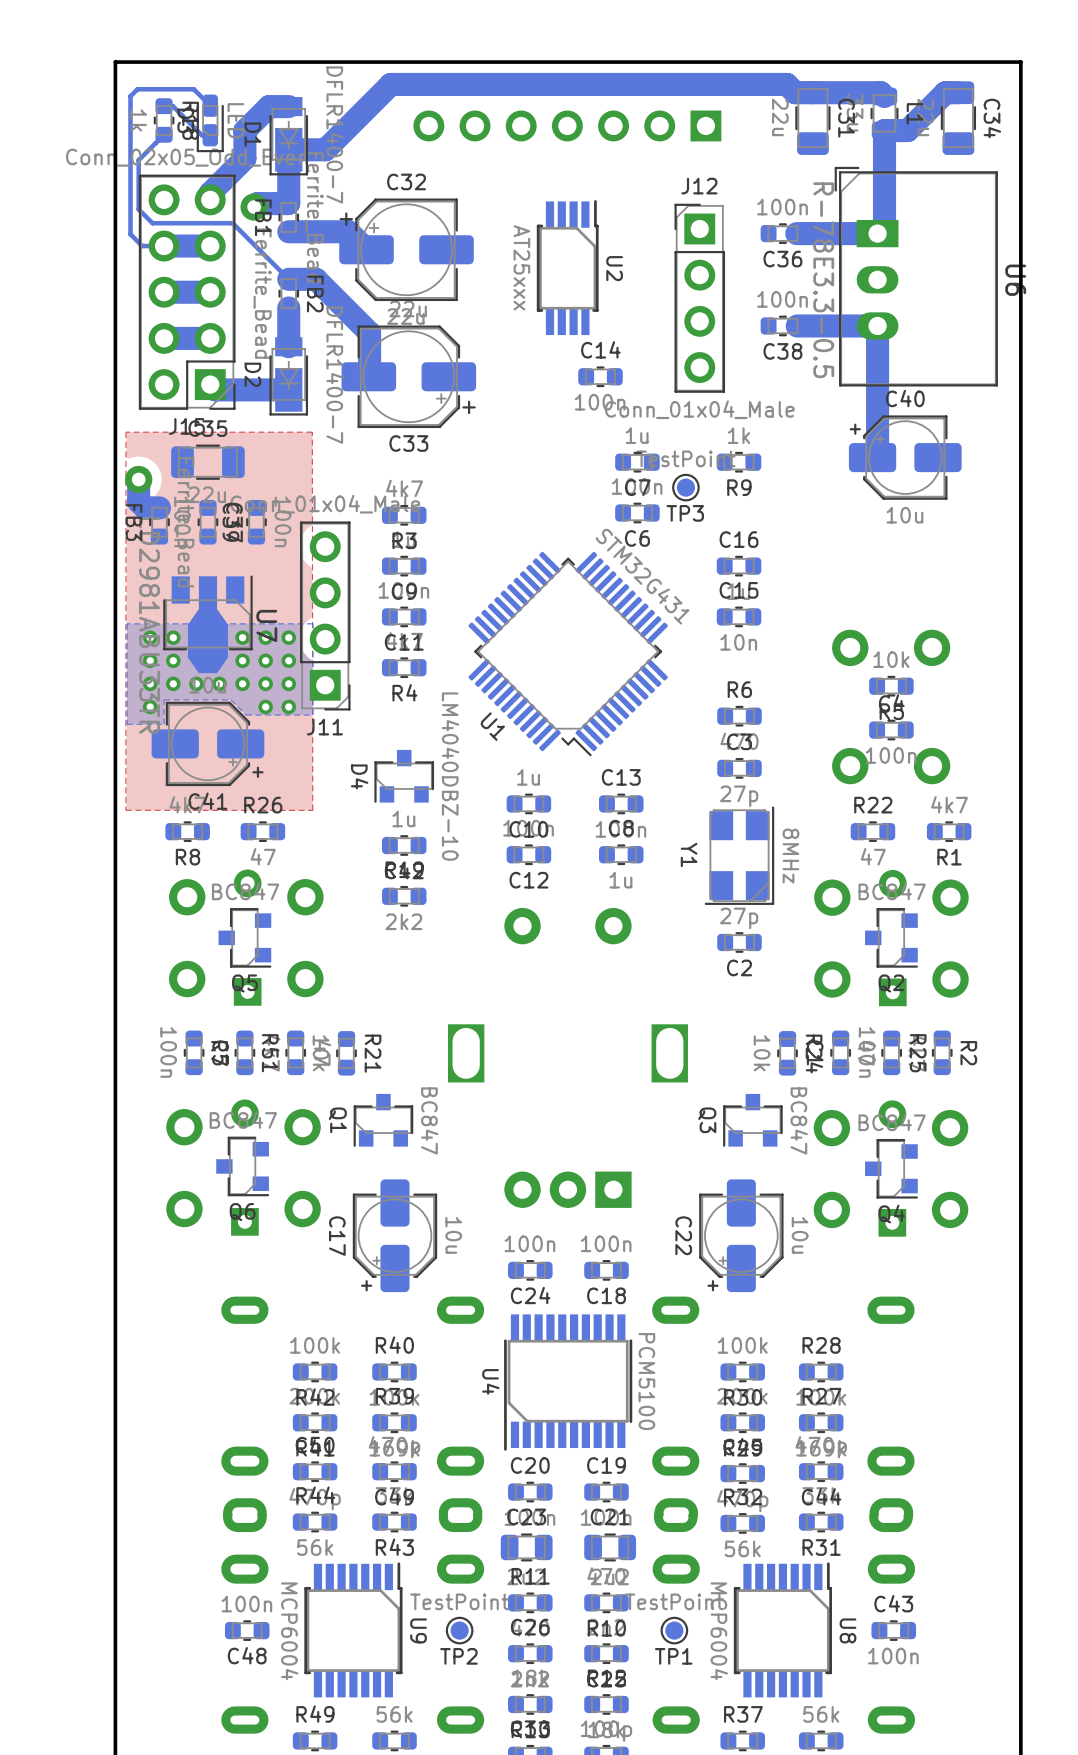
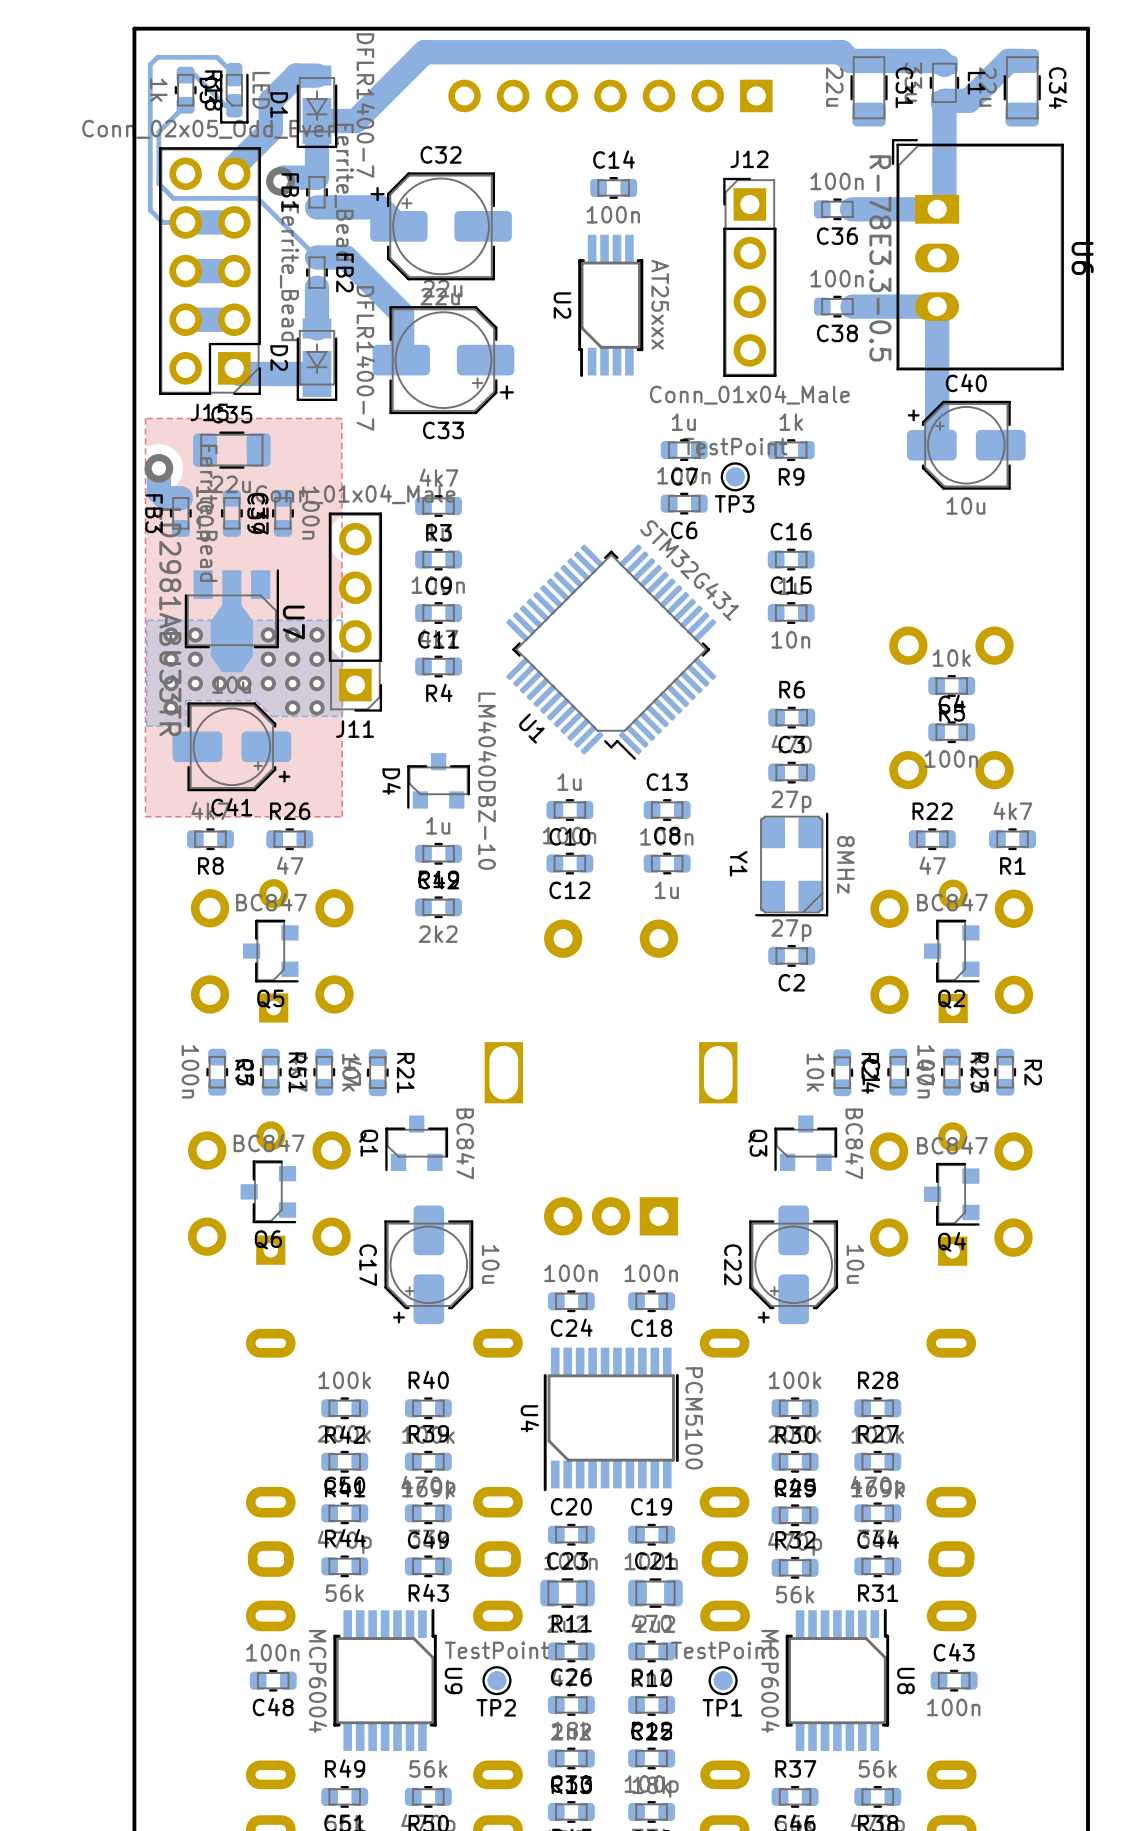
U2 rotation: 0° (567, 267) -> 180° (610, 305)
C14 position: (600, 376) -> (613, 187)

